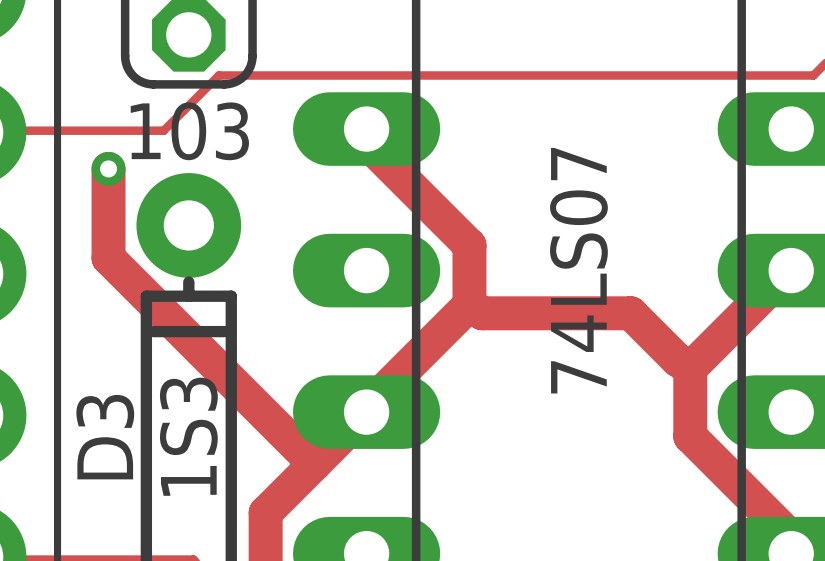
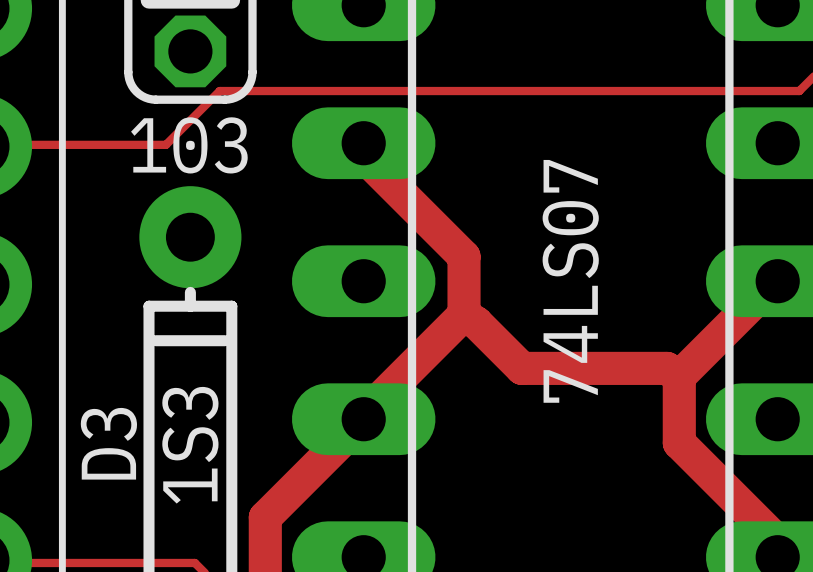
track: (108, 168) (108, 258) (314, 464) -> none
via: (108, 168) -> none
track: (482, 313) (630, 313) (677, 360) -> (476, 322) (521, 368) (666, 368)

